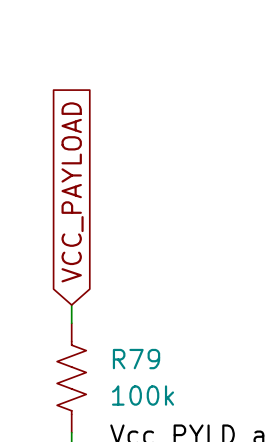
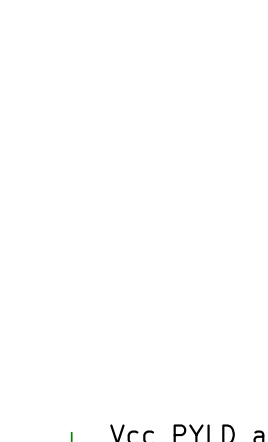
global label: VCC_PAYLOAD (72, 192) -> none
wire: (71, 305) (71, 323) -> none
R79: 100k (71, 377) -> none

